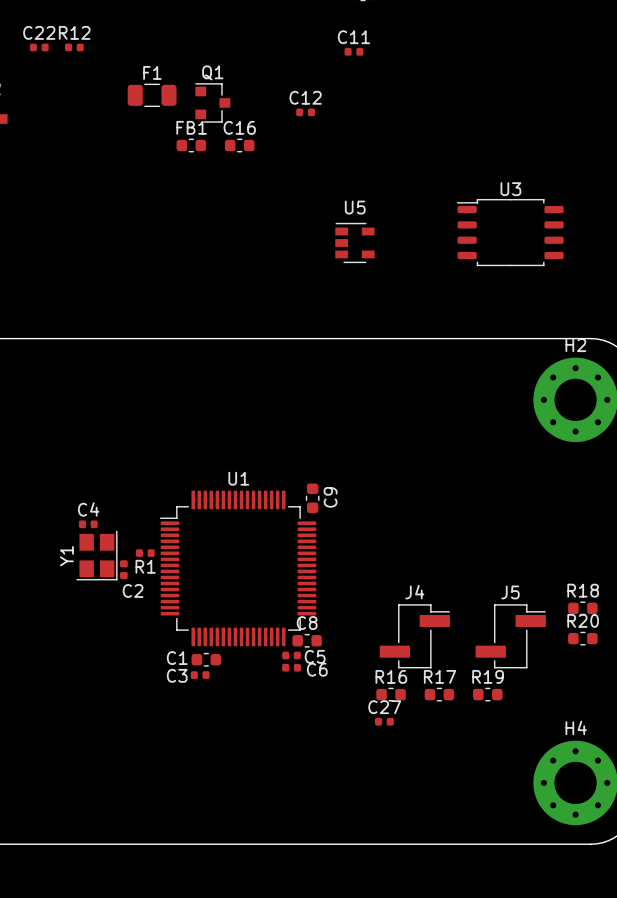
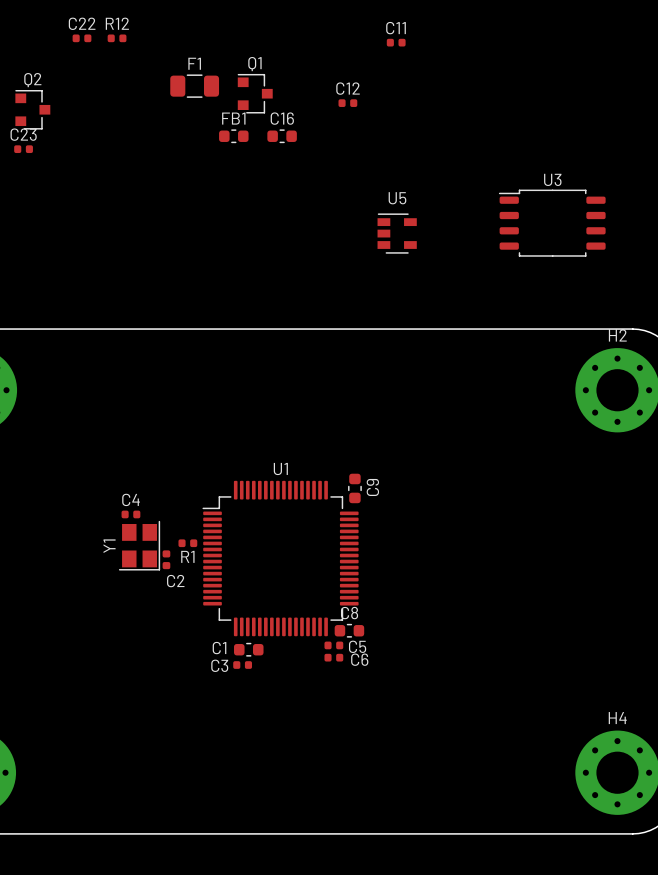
R18: (582, 608) -> none
J4: (414, 636) -> none
J5: (510, 636) -> none
R20: (582, 638) -> none
R16: (391, 694) -> none
R17: (439, 694) -> none
R19: (487, 694) -> none
C27: (384, 721) -> none

